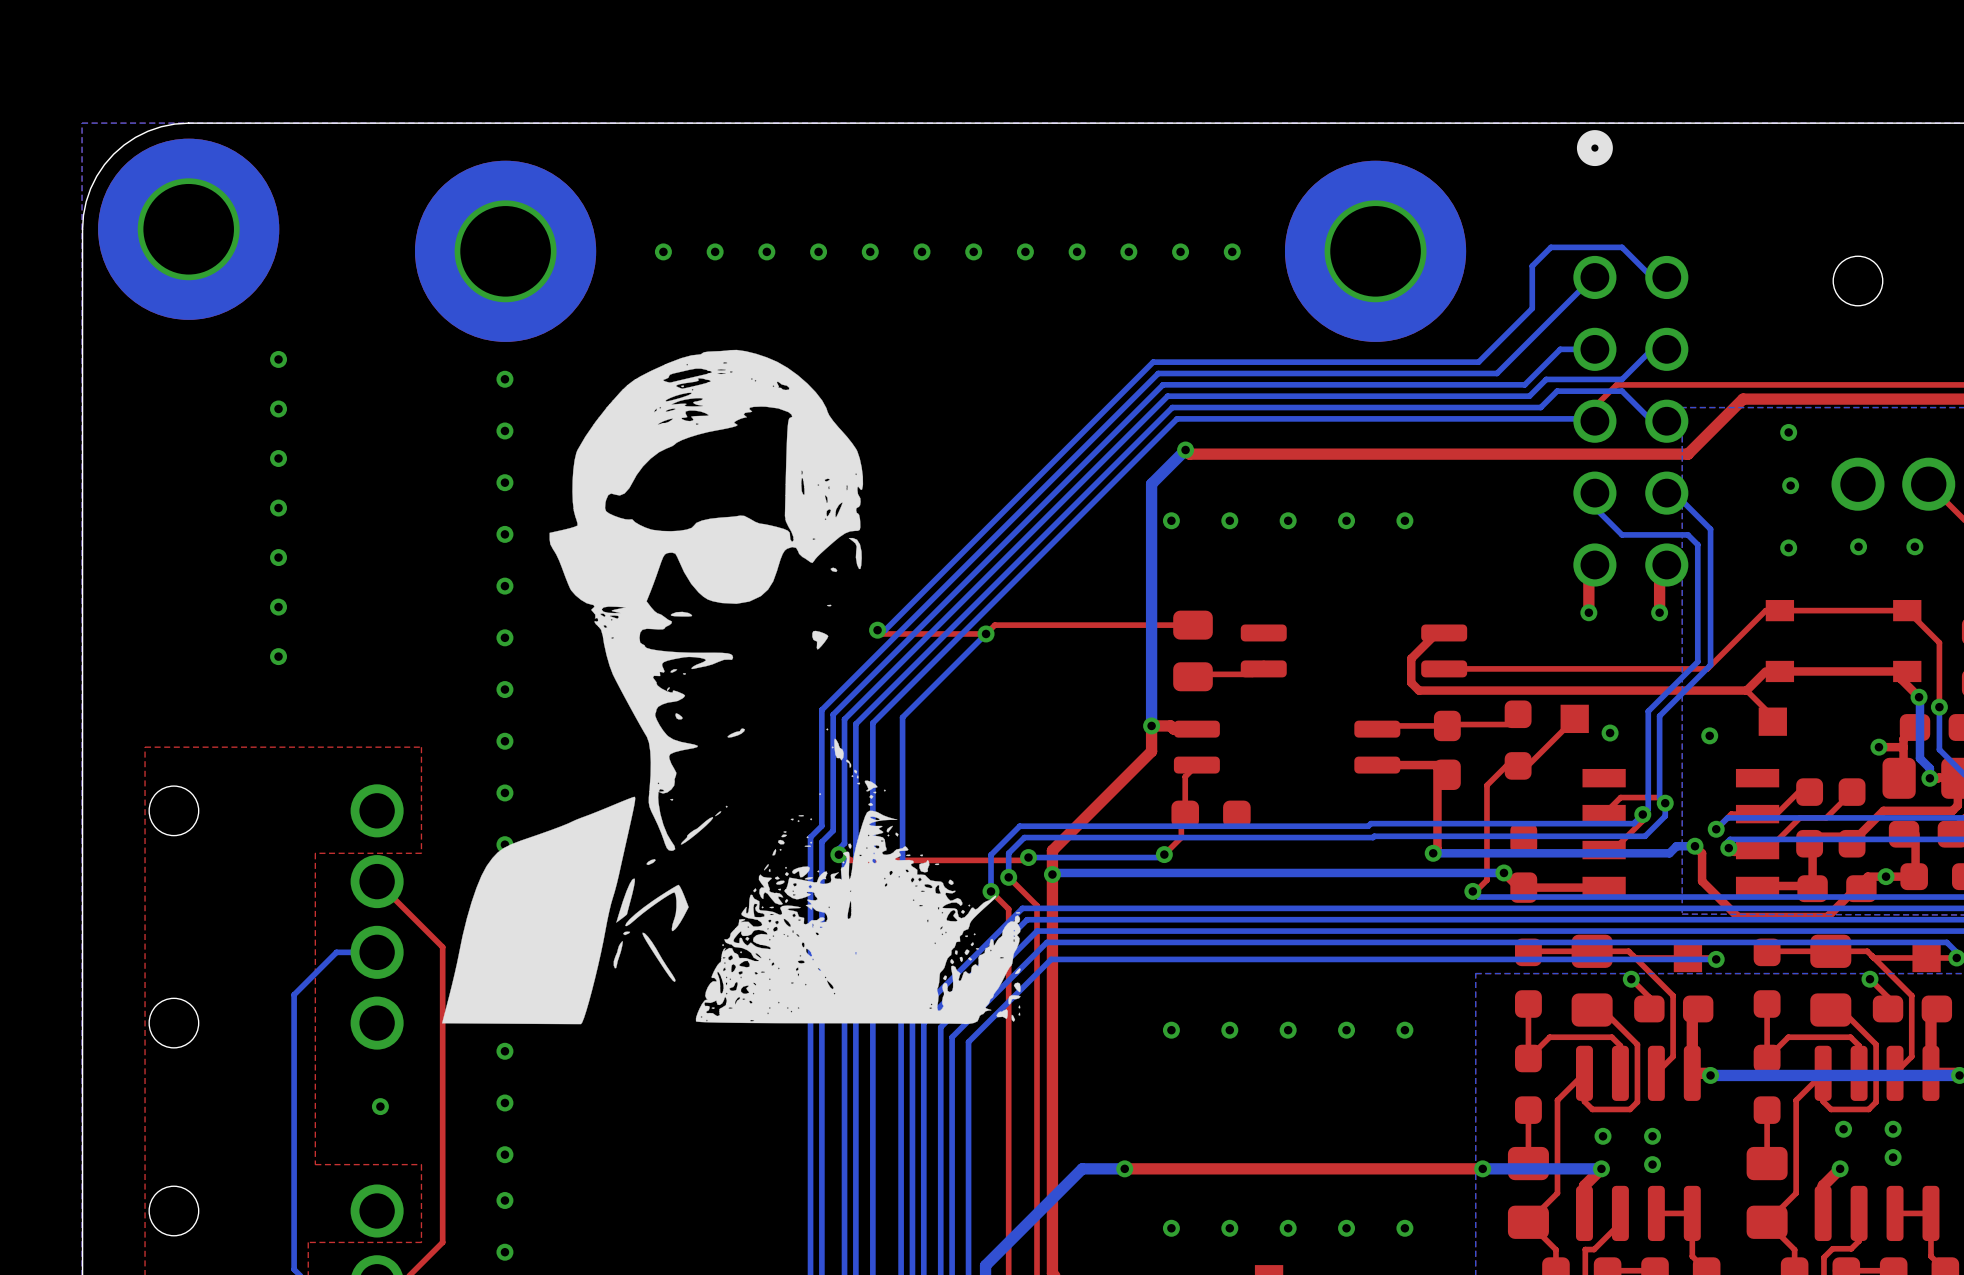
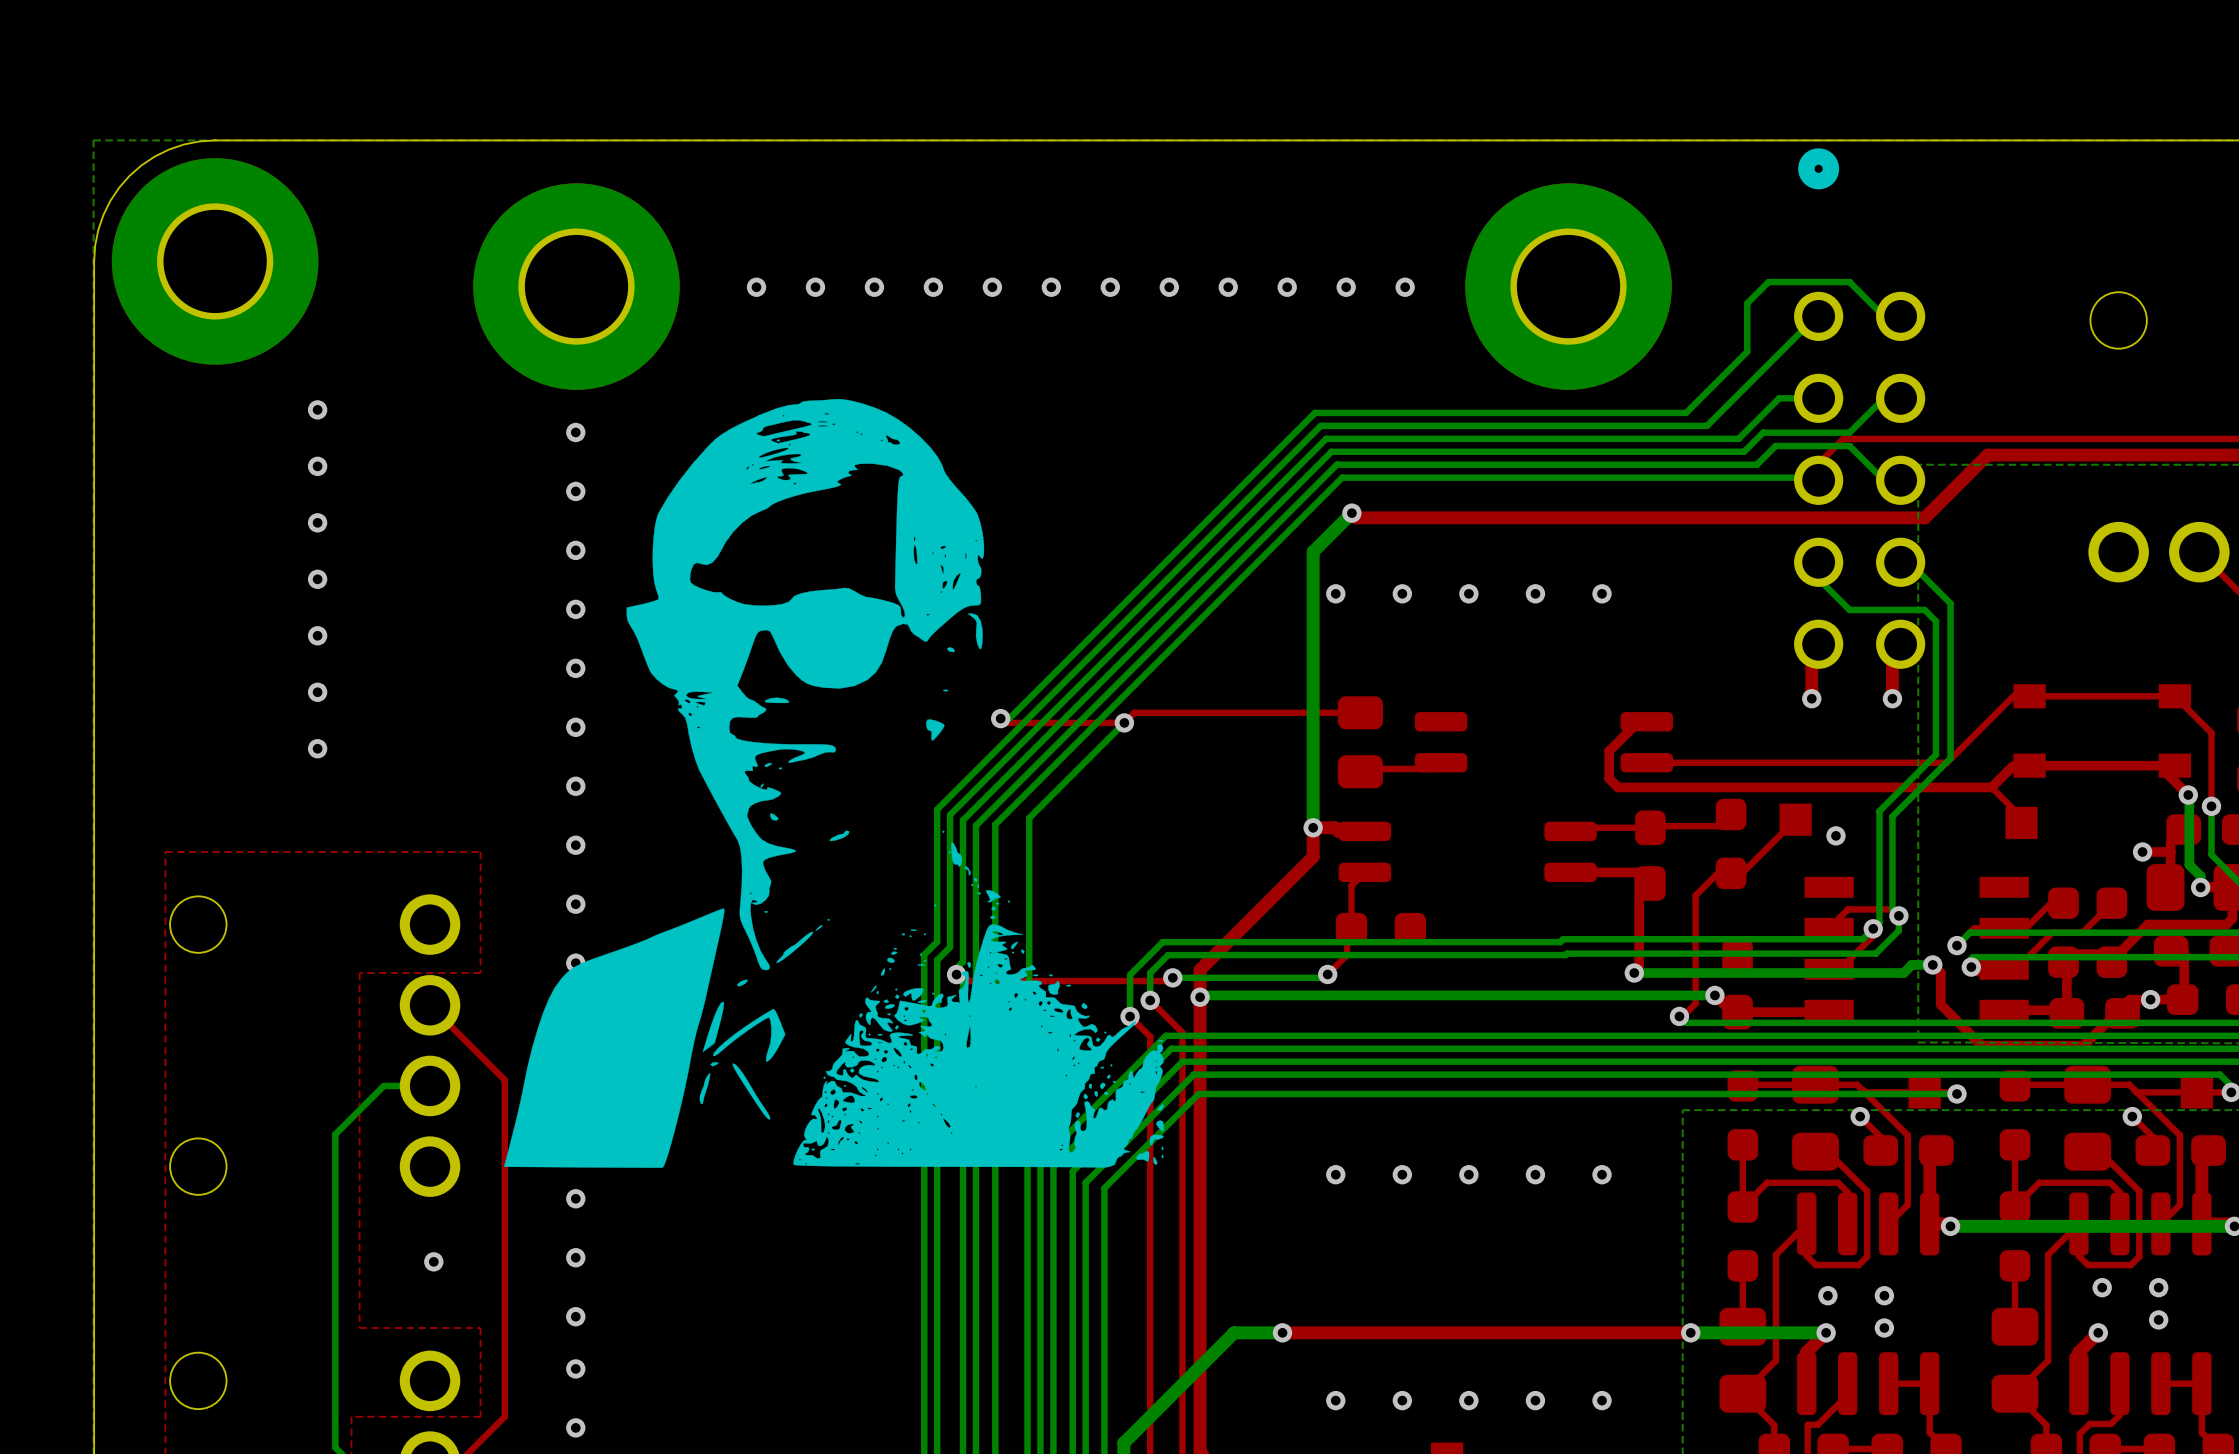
via: (1788, 432) -> none
via: (1790, 485) -> none
via: (1858, 546) -> none
via: (1914, 546) -> none
via: (1788, 547) -> none
via: (1709, 735) -> none

